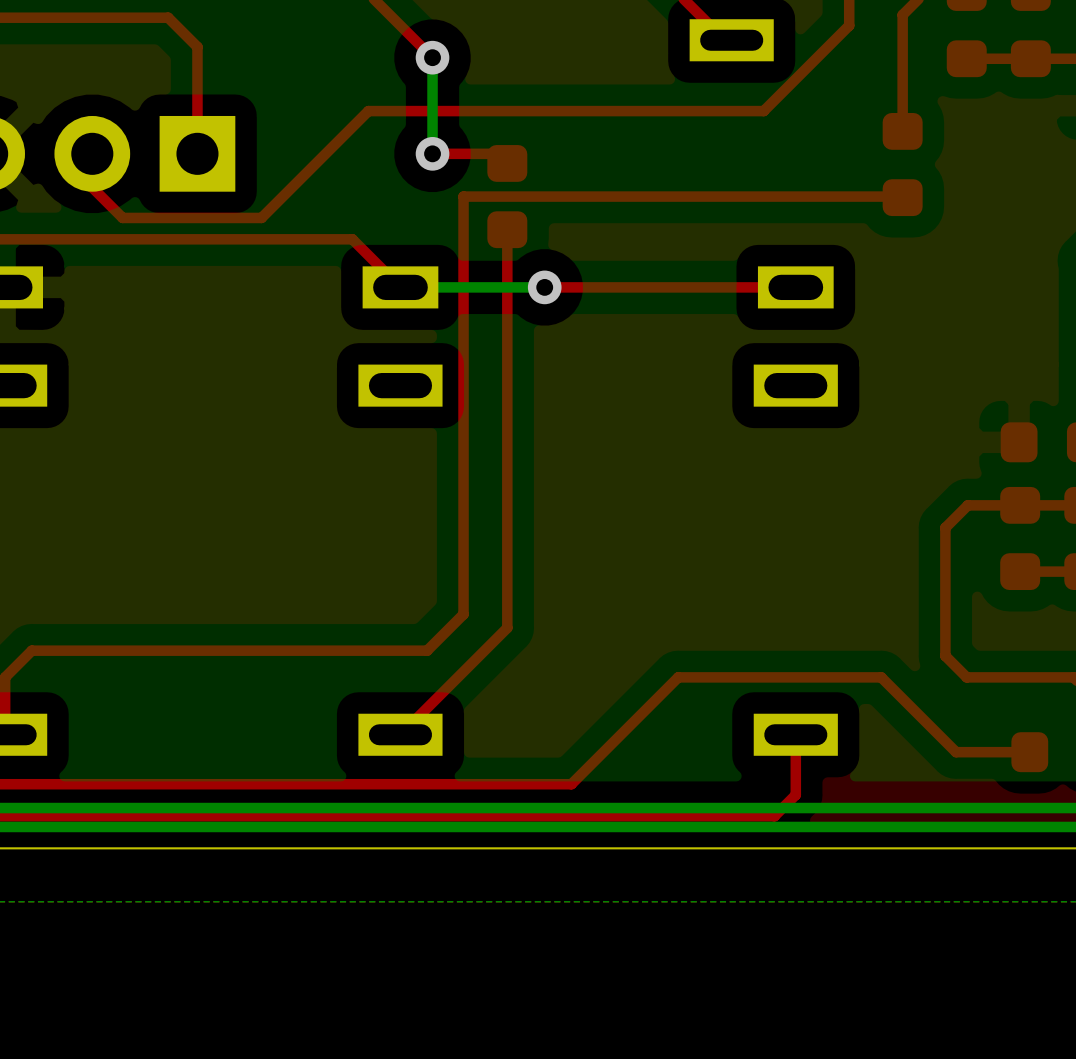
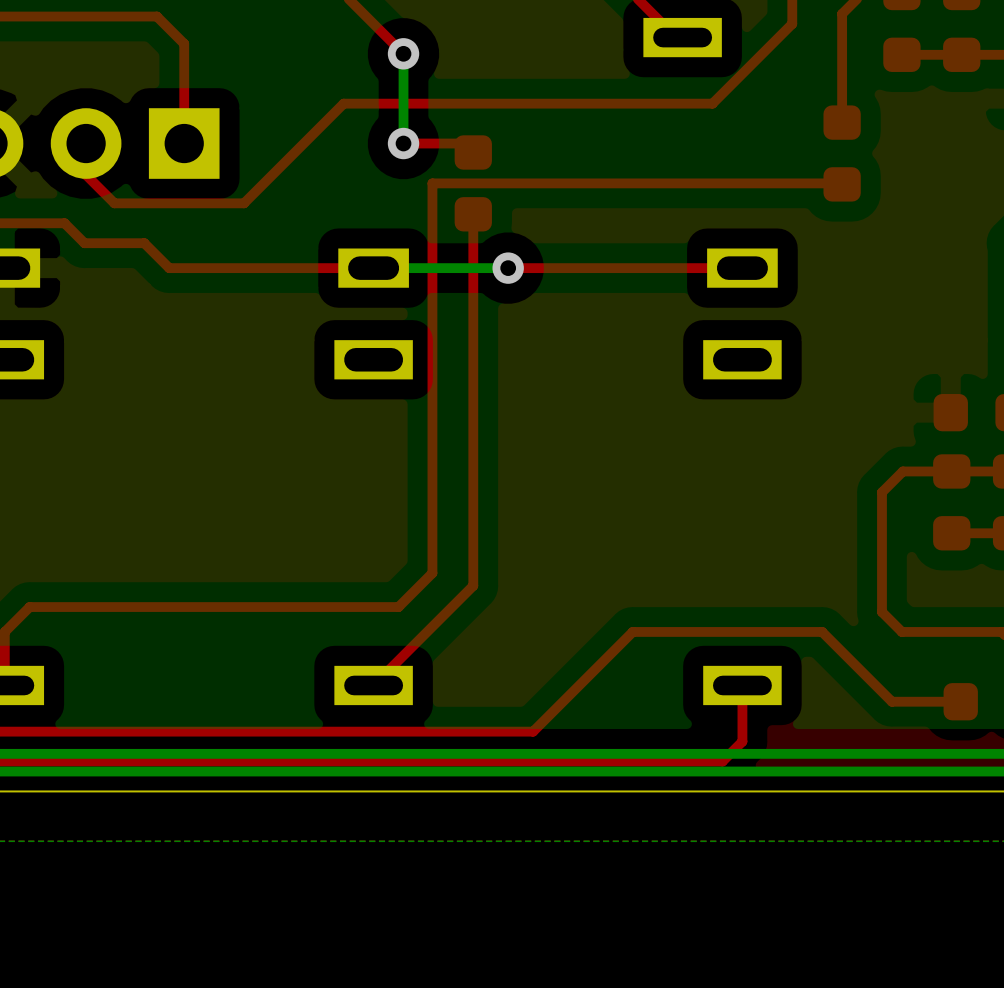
top track: (69, 239) (352, 239) (400, 287) -> (64, 223) (84, 243) (144, 243) (169, 268) (373, 268)

